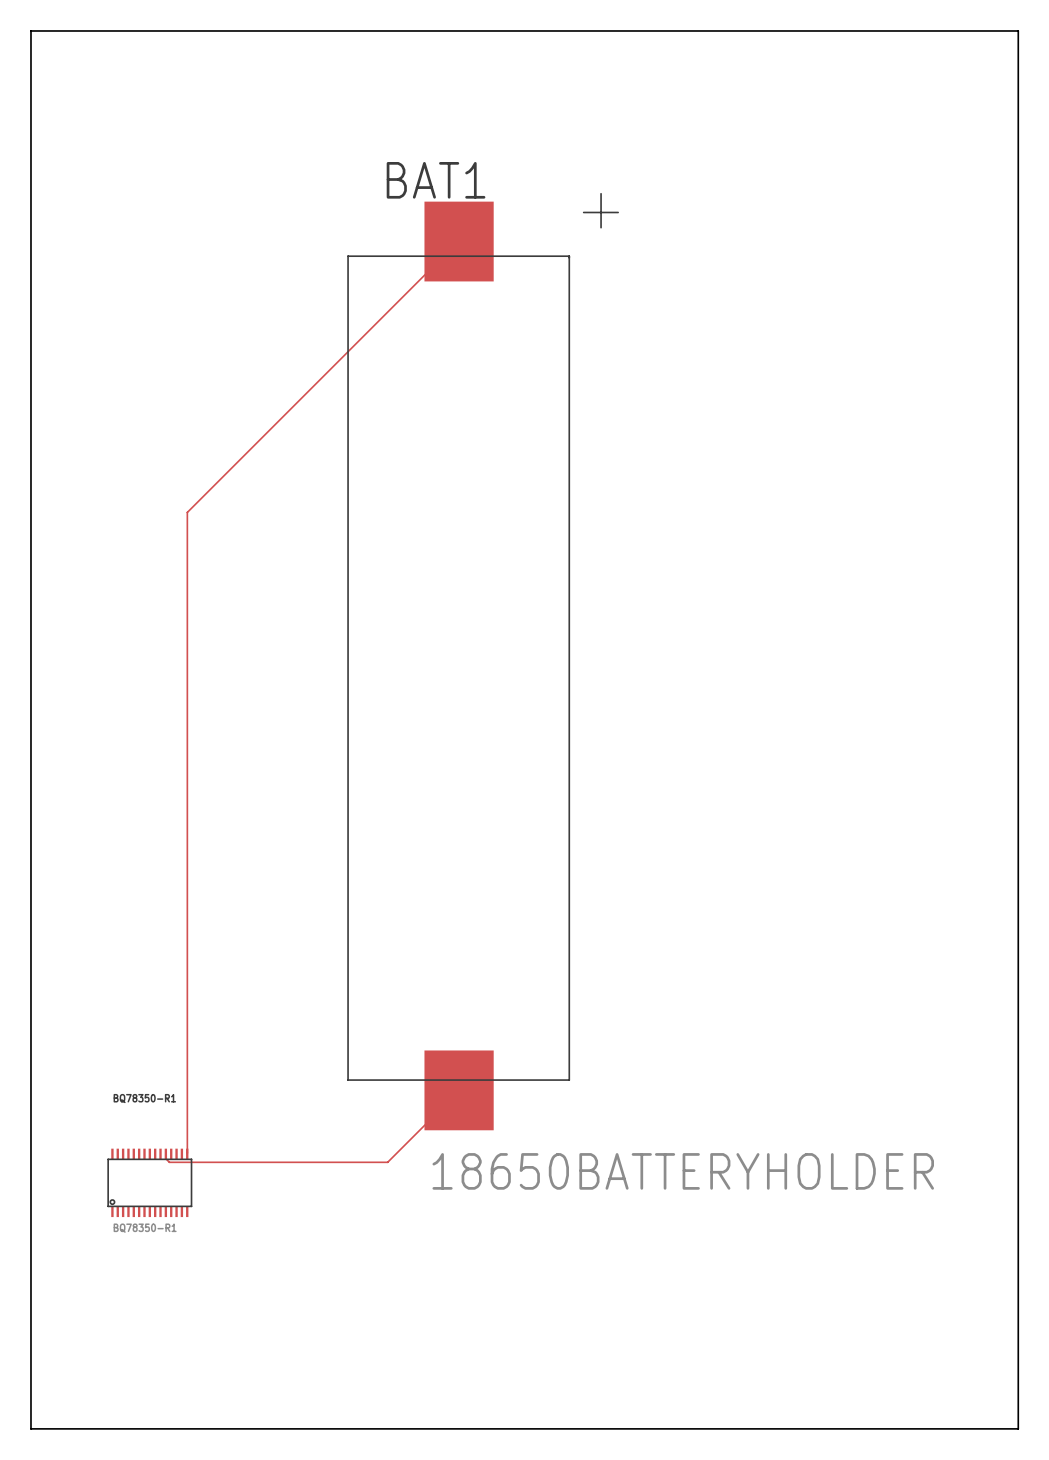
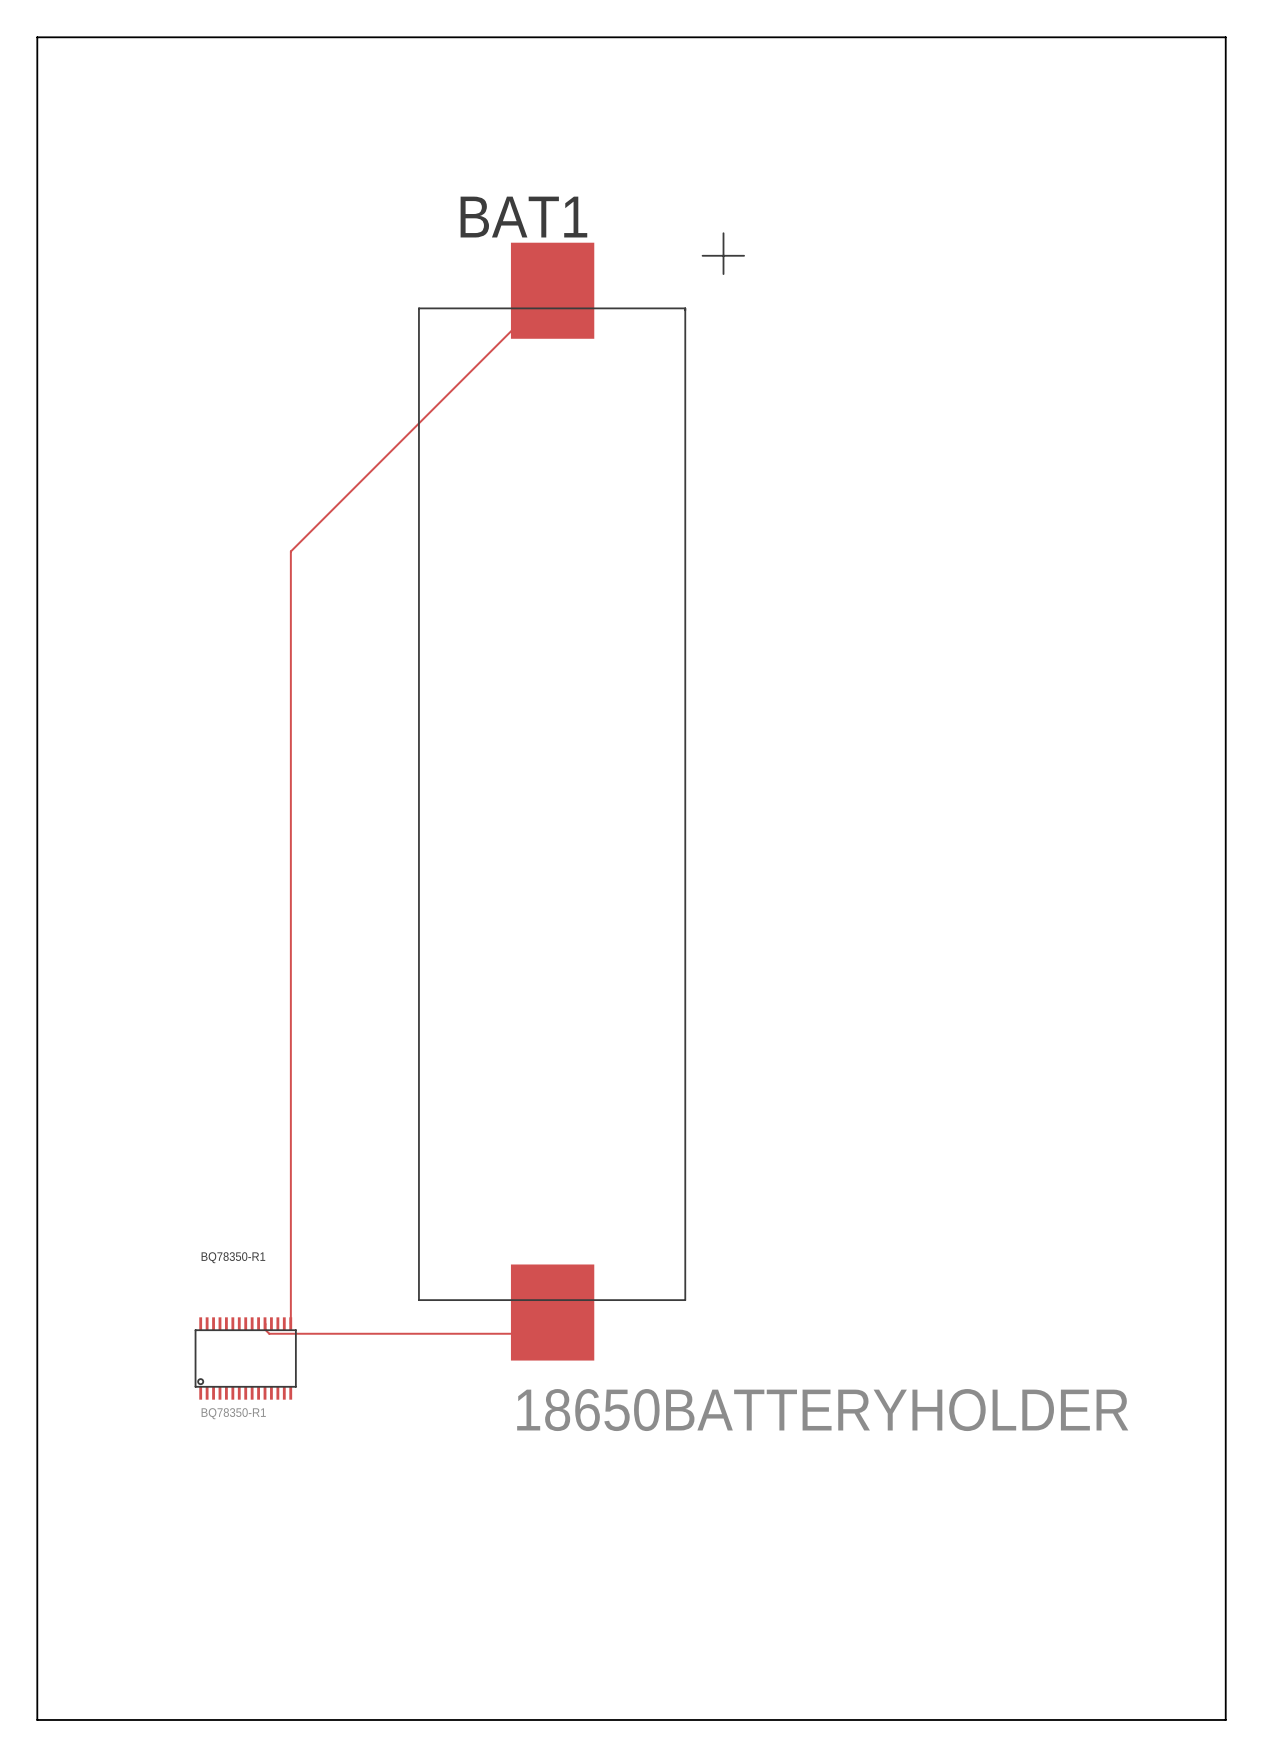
top track: (241, 458) (187, 512) (187, 1154) -> (290, 551) (290, 1323)
top track: (441, 1108) (387, 1162) (169, 1162) (166, 1159) (165, 1154) -> (532, 1333) (269, 1333) (265, 1329) (265, 1323)
BQ78350-R1 position: (149, 1182) -> (245, 1358)

